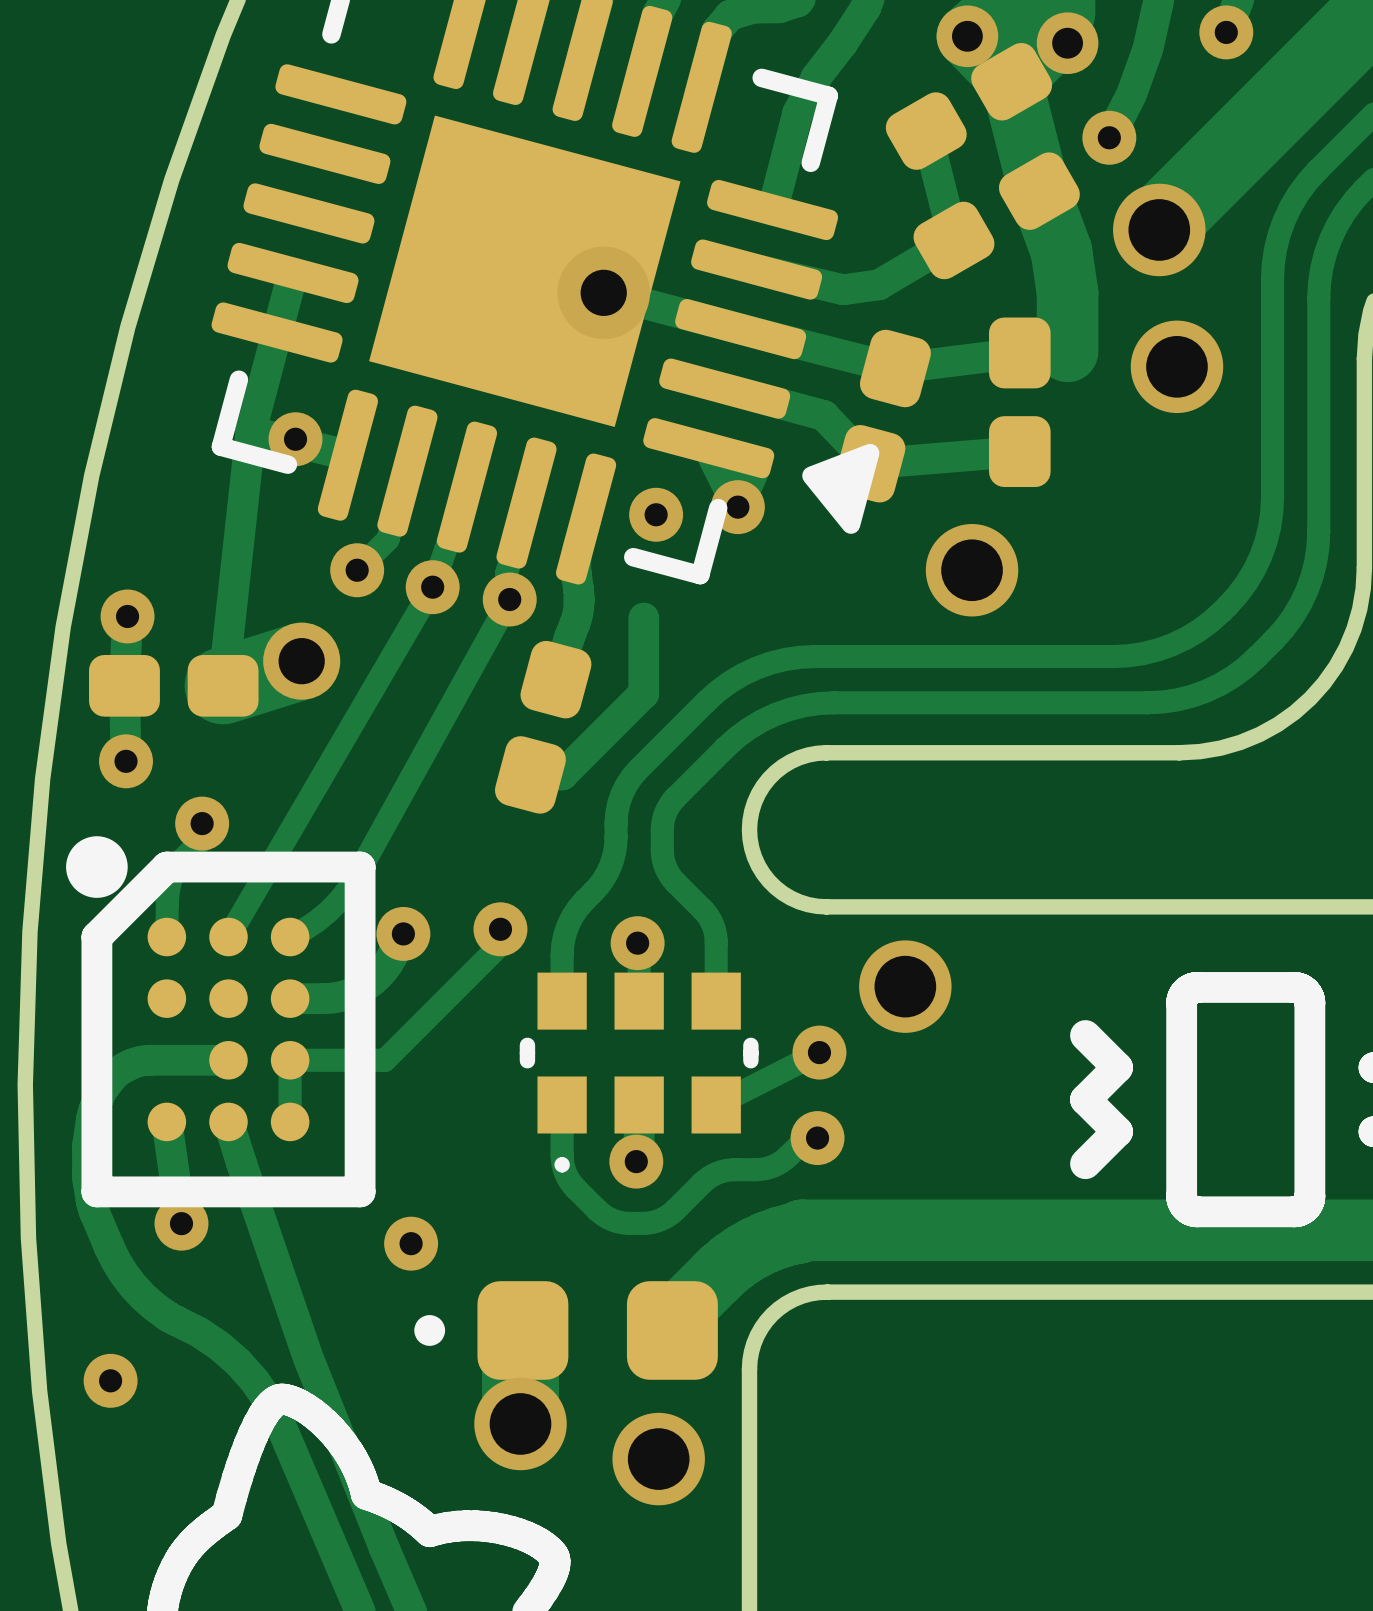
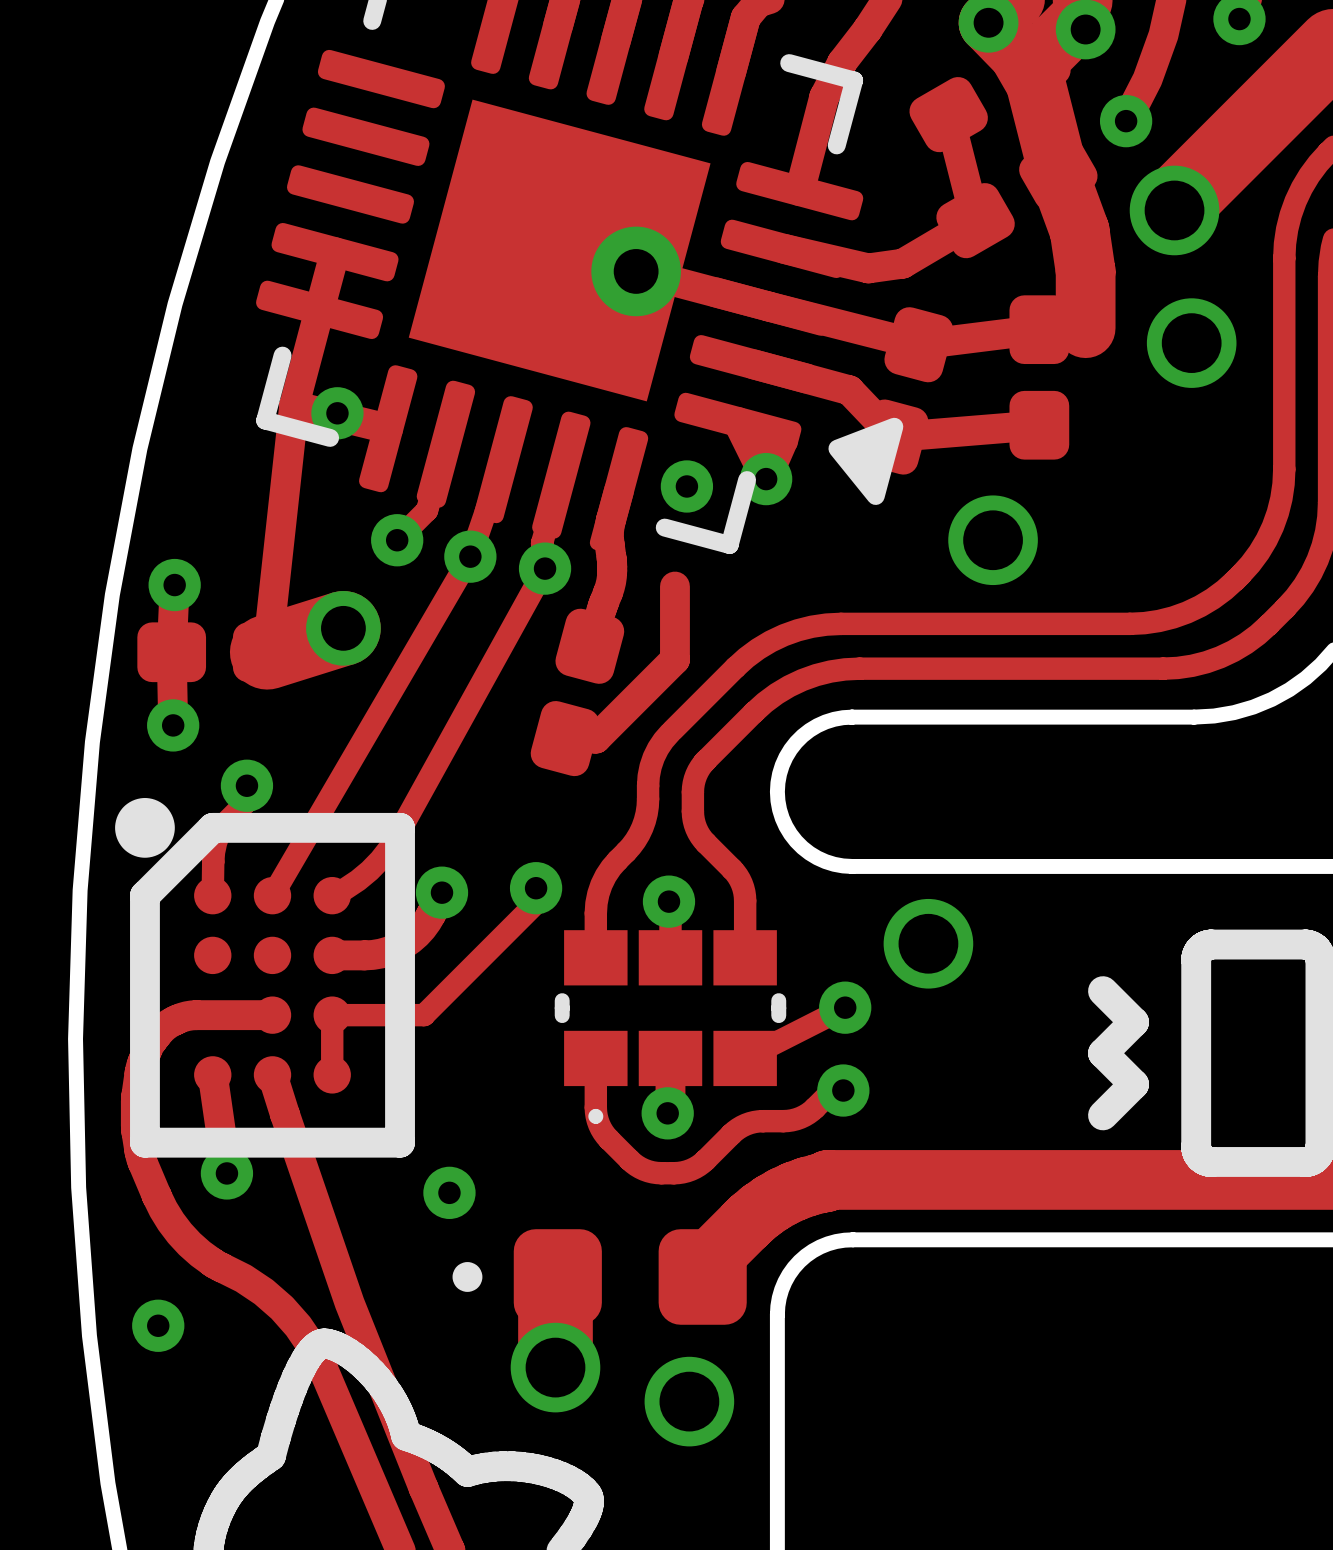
part footprint: [519, 972, 759, 1173] -> [554, 930, 787, 1124]

